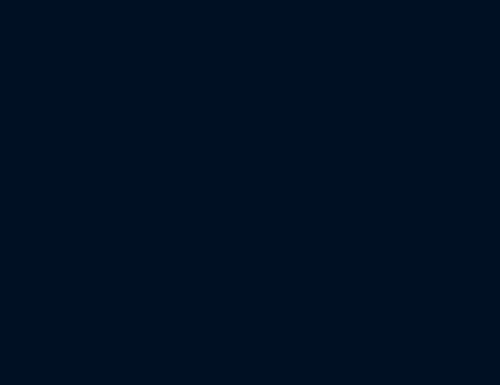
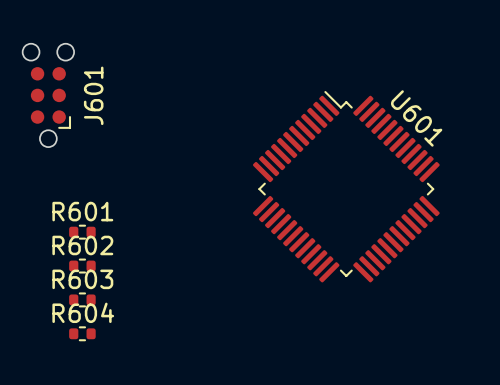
J601: none -> (48, 95)
U601: none -> (346, 186)
R601: none -> (82, 232)
R602: none -> (82, 266)
R603: none -> (82, 299)
R604: none -> (82, 333)

